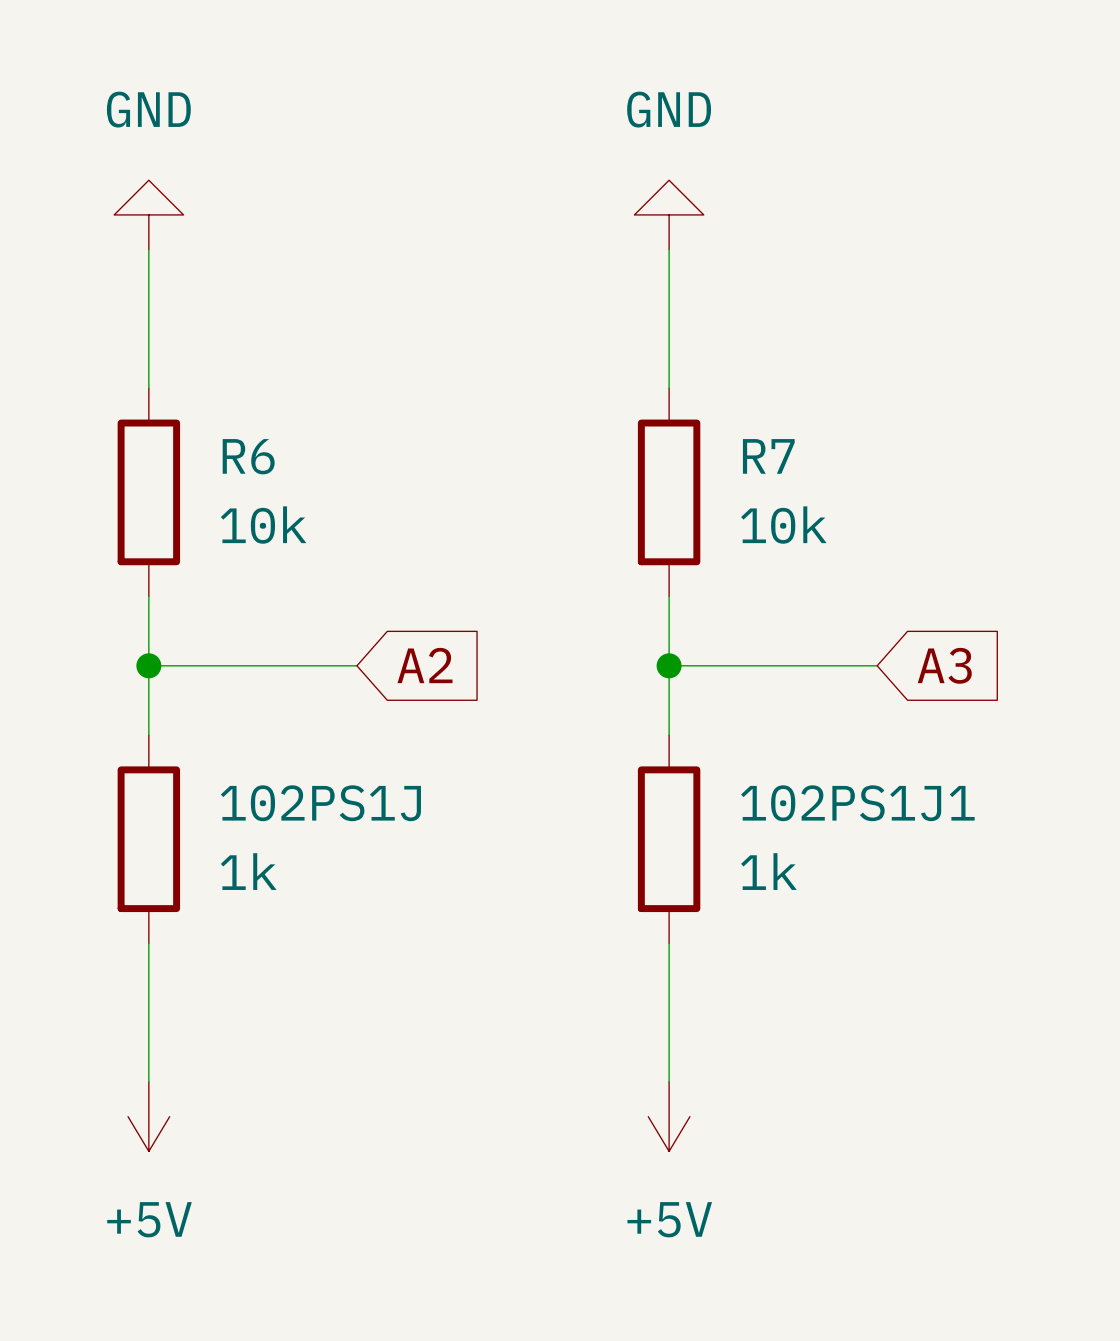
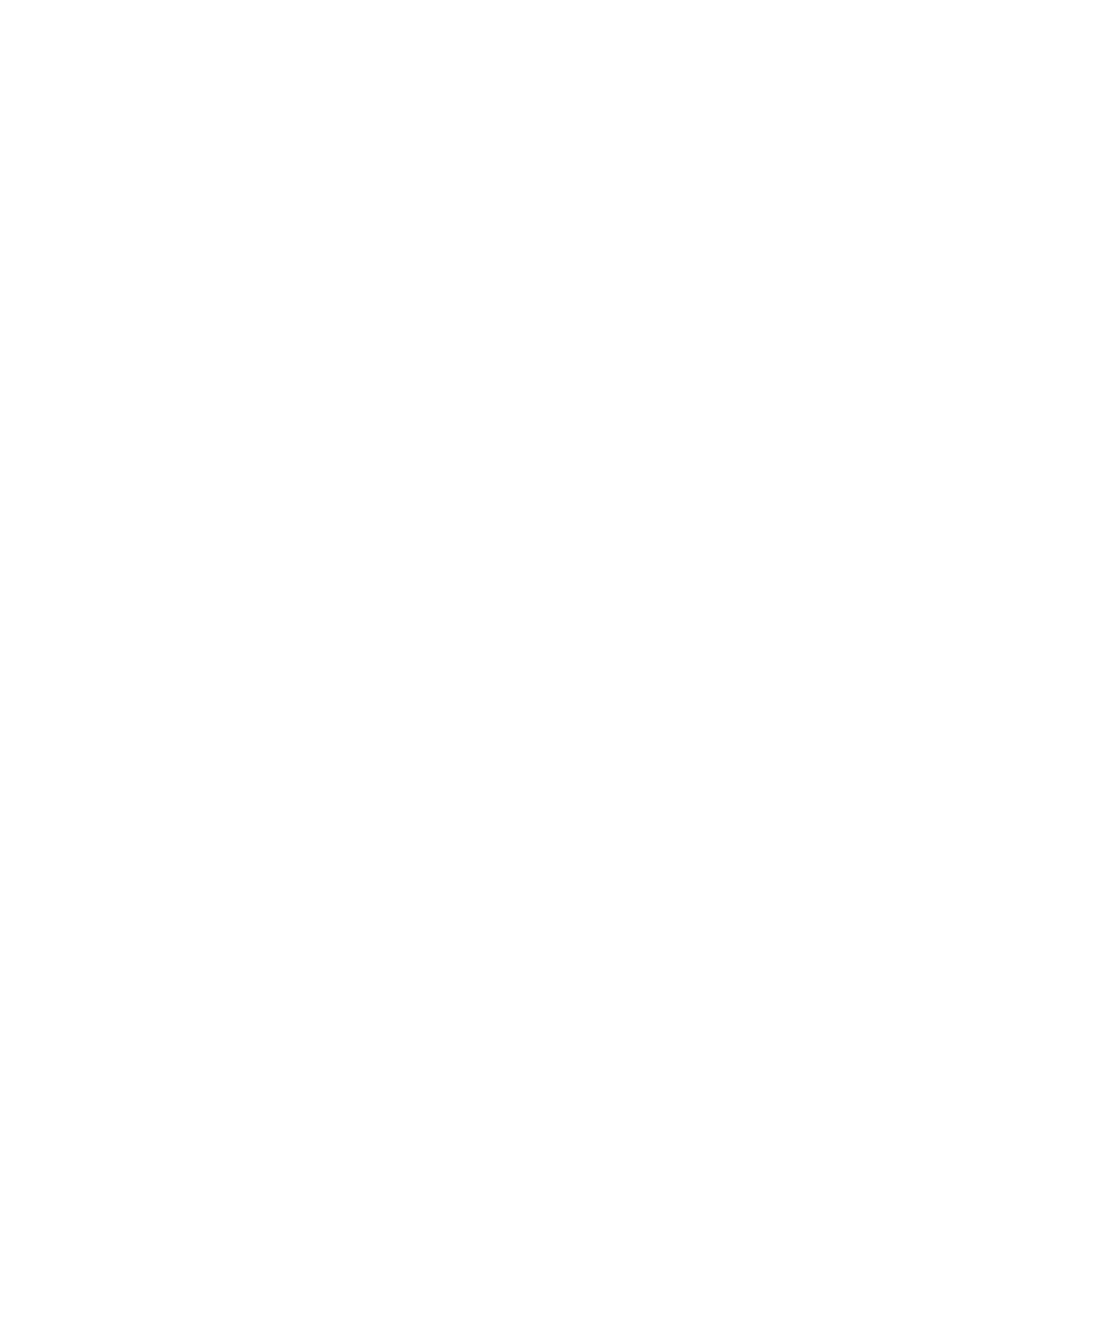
power symbol: GND (148, 214) -> none
power symbol: GND (669, 214) -> none
wire: (148, 249) (148, 388) -> none
wire: (669, 249) (669, 388) -> none
R6: 10k (148, 492) -> none
R7: 10k (669, 492) -> none
wire: (148, 596) (148, 735) -> none
wire: (669, 596) (669, 735) -> none
wire: (148, 665) (356, 665) -> none
junction: (148, 665) -> none
global label: A2 (424, 665) -> none
wire: (669, 665) (877, 665) -> none
junction: (669, 665) -> none
global label: A3 (944, 665) -> none
102PS1J: 1k (148, 839) -> none
102PS1J1: 1k (669, 839) -> none
wire: (148, 943) (148, 1082) -> none
wire: (669, 943) (669, 1082) -> none
power symbol: +5V (148, 1116) -> none
power symbol: +5V (669, 1116) -> none

